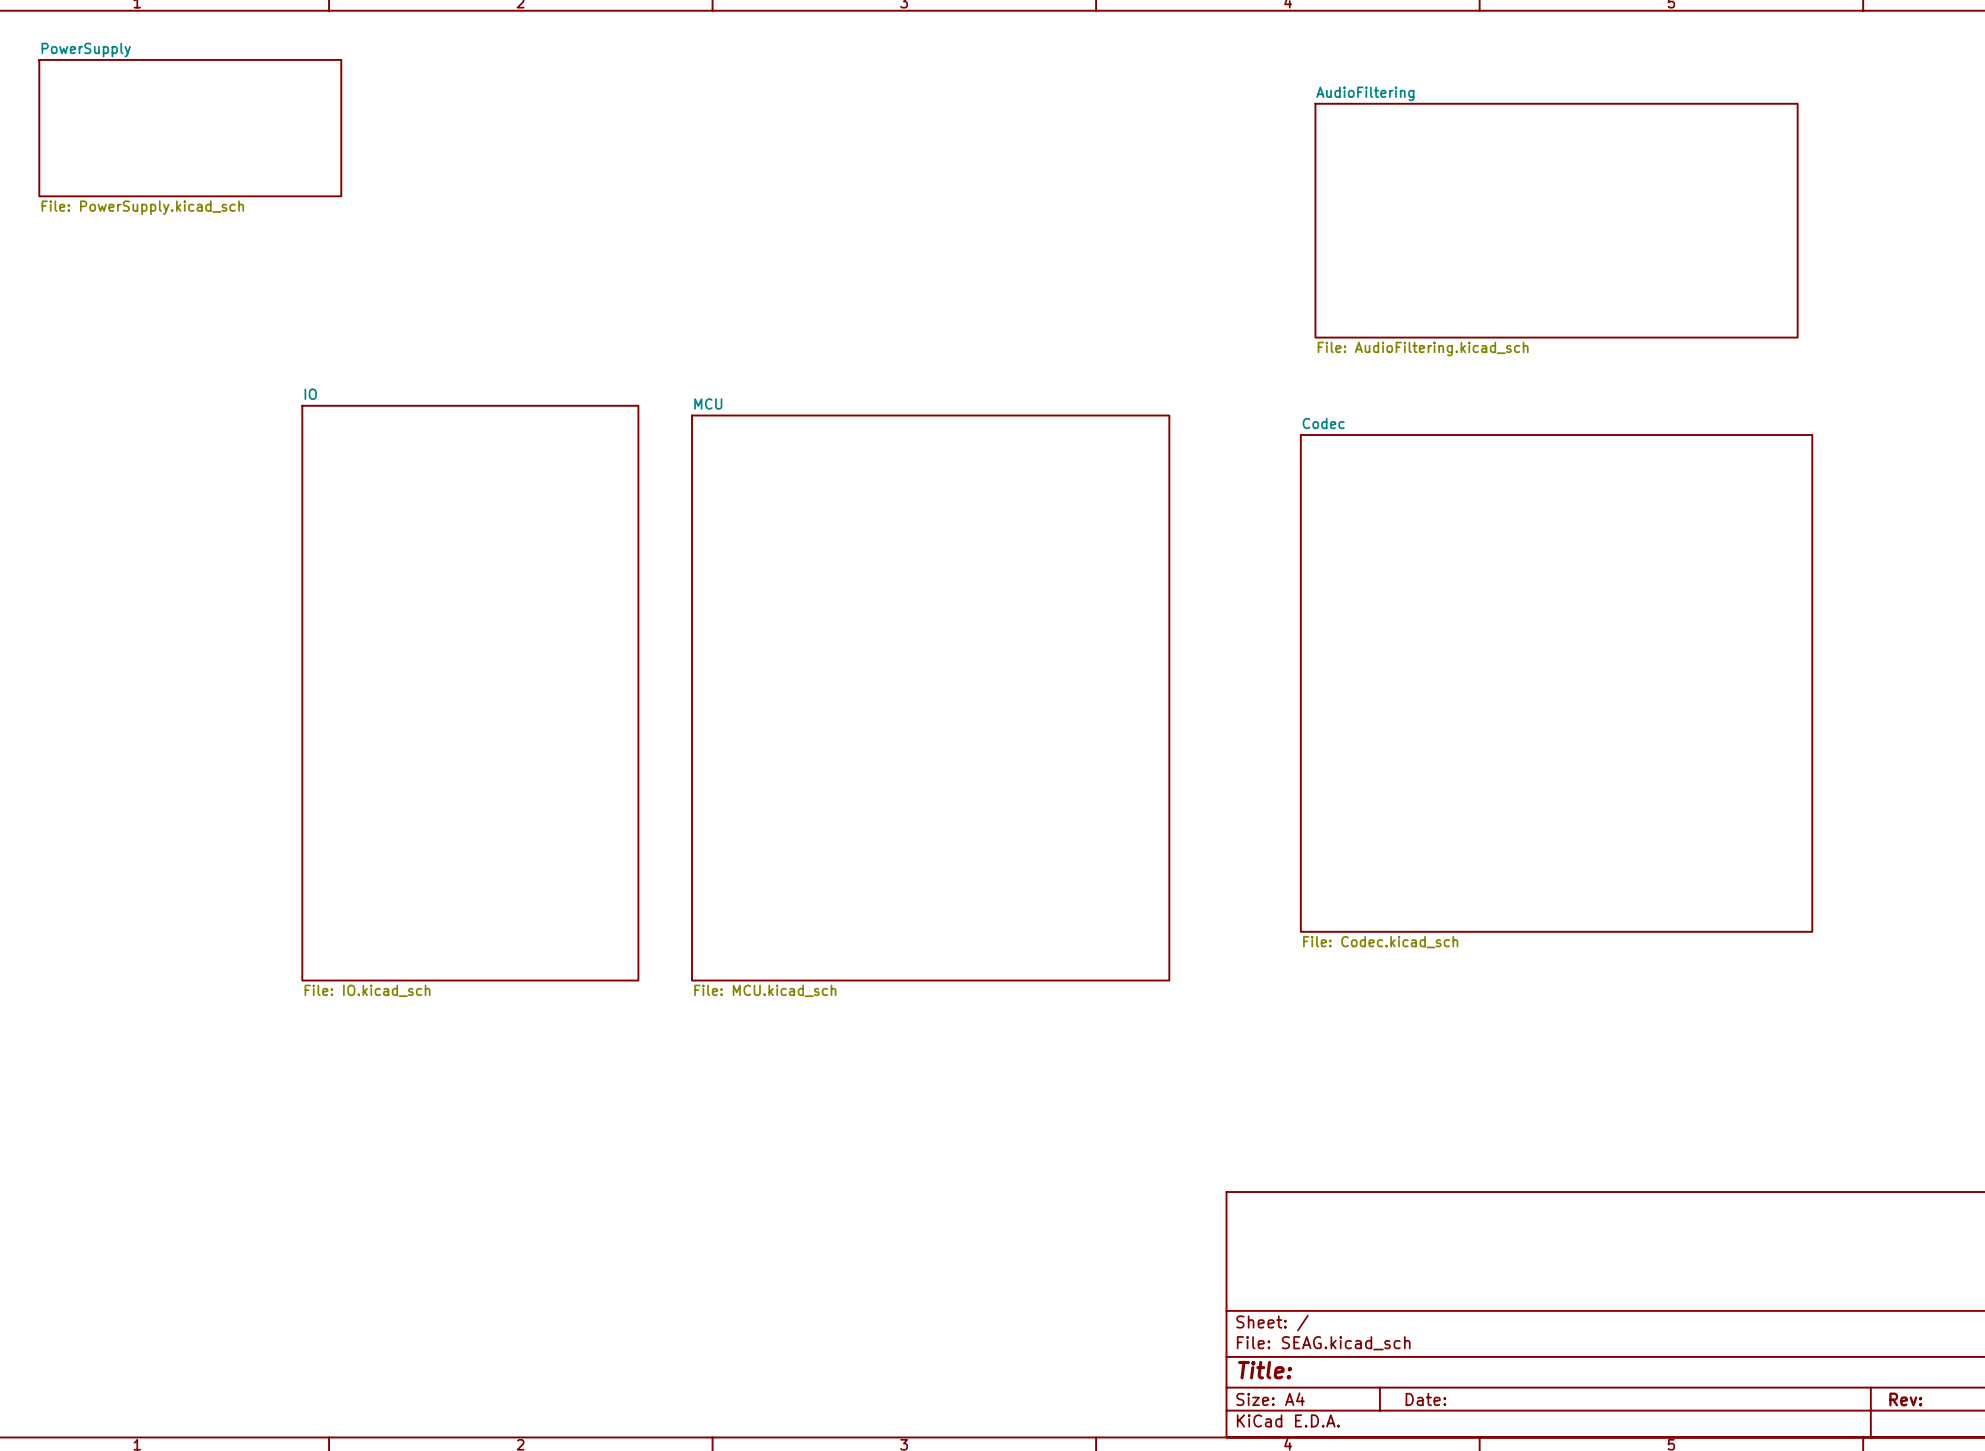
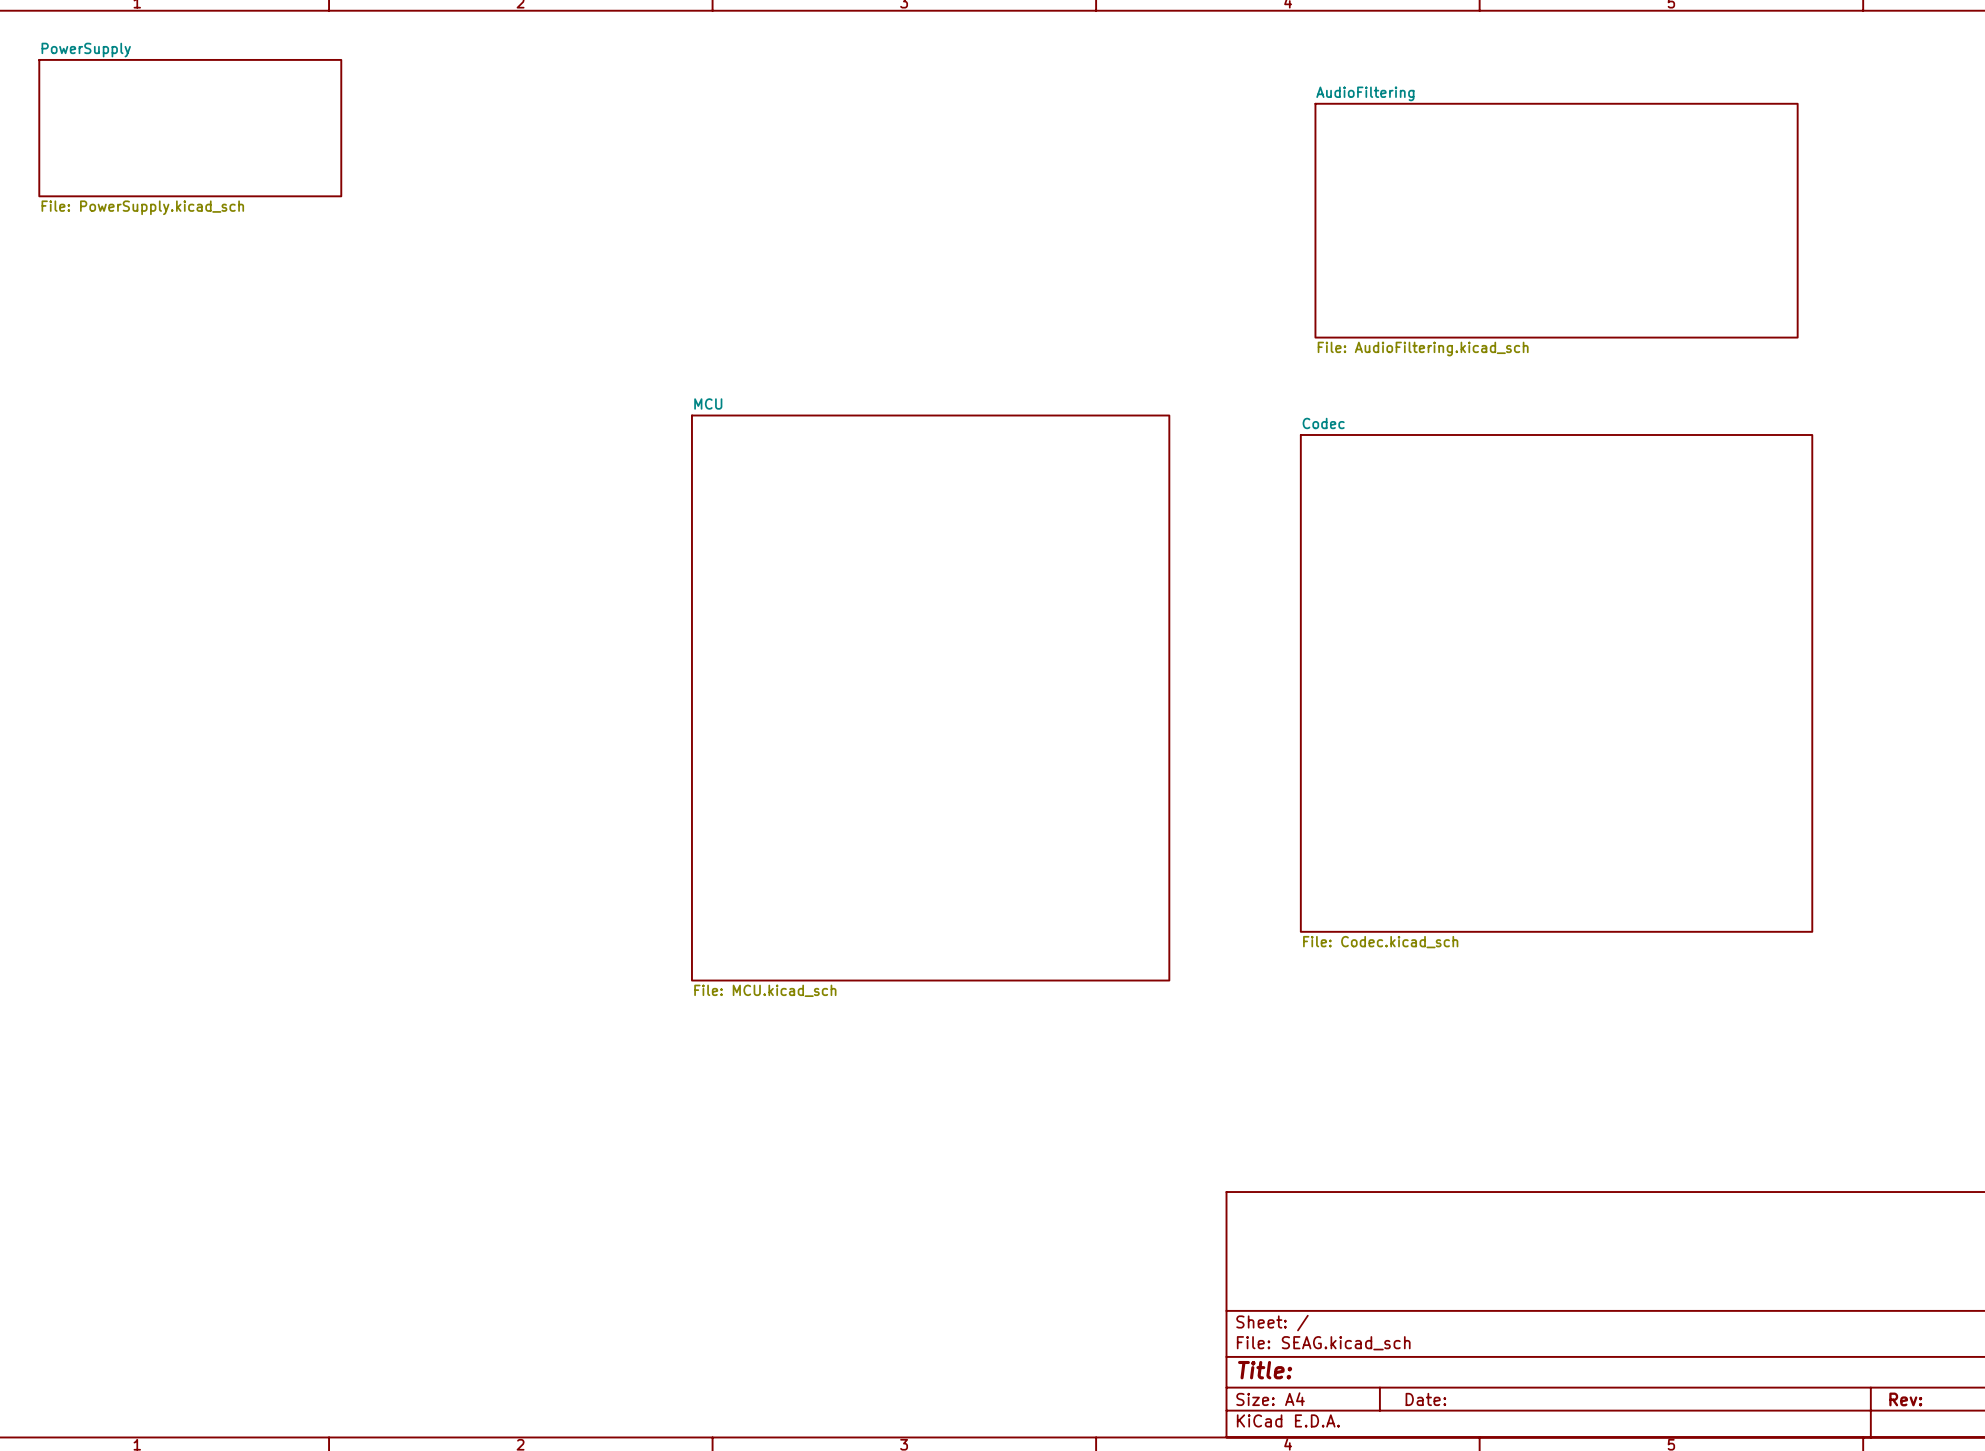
sheet IO: File: IO.kicad_sch (470, 693) -> none

